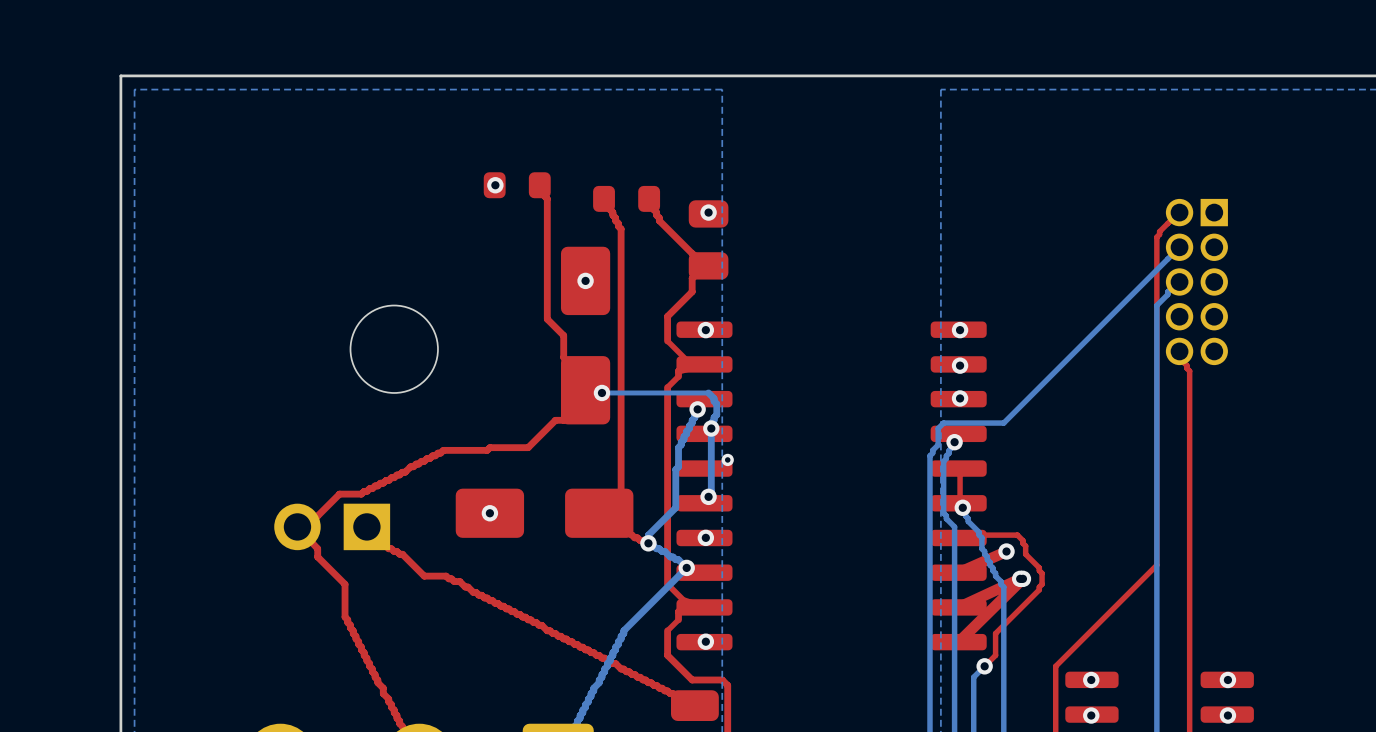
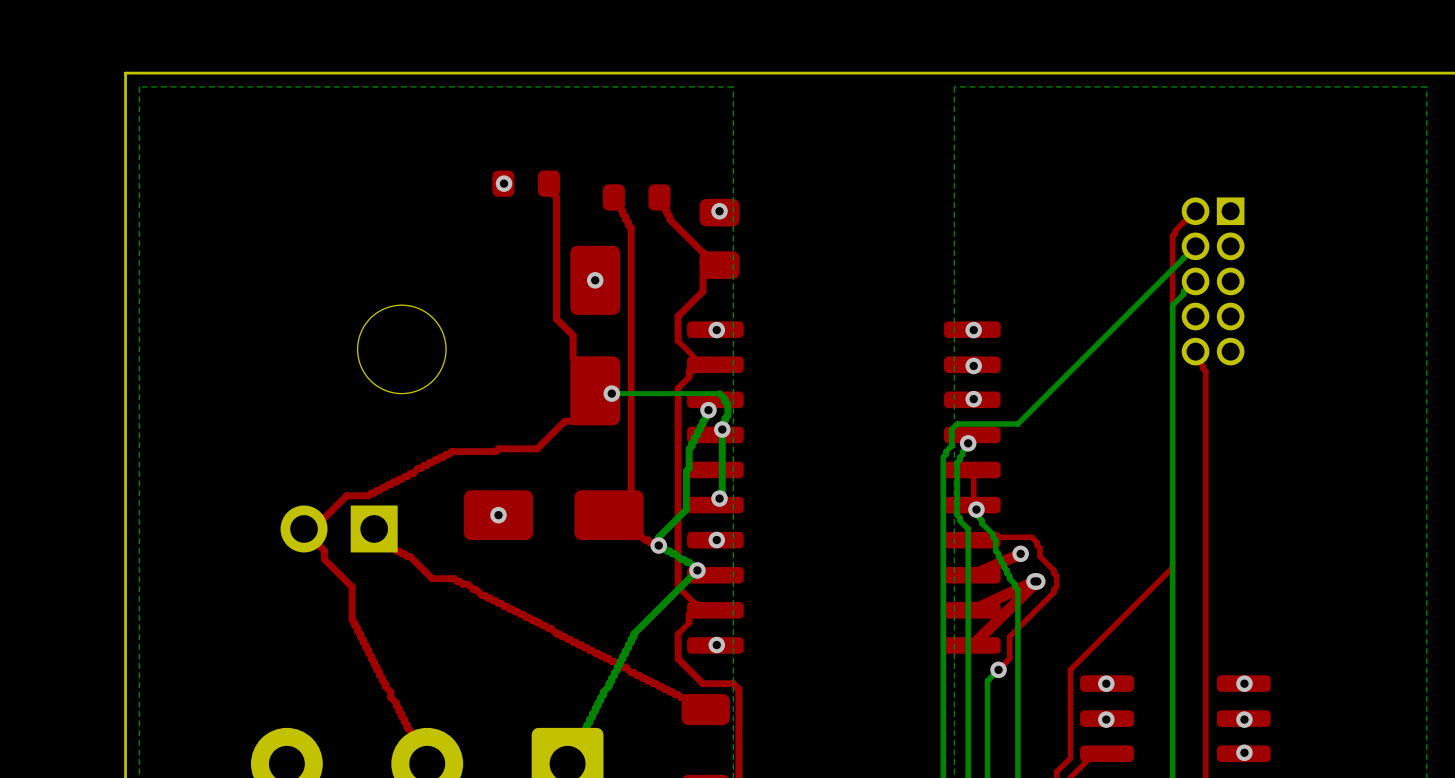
via: (727, 459) -> none

